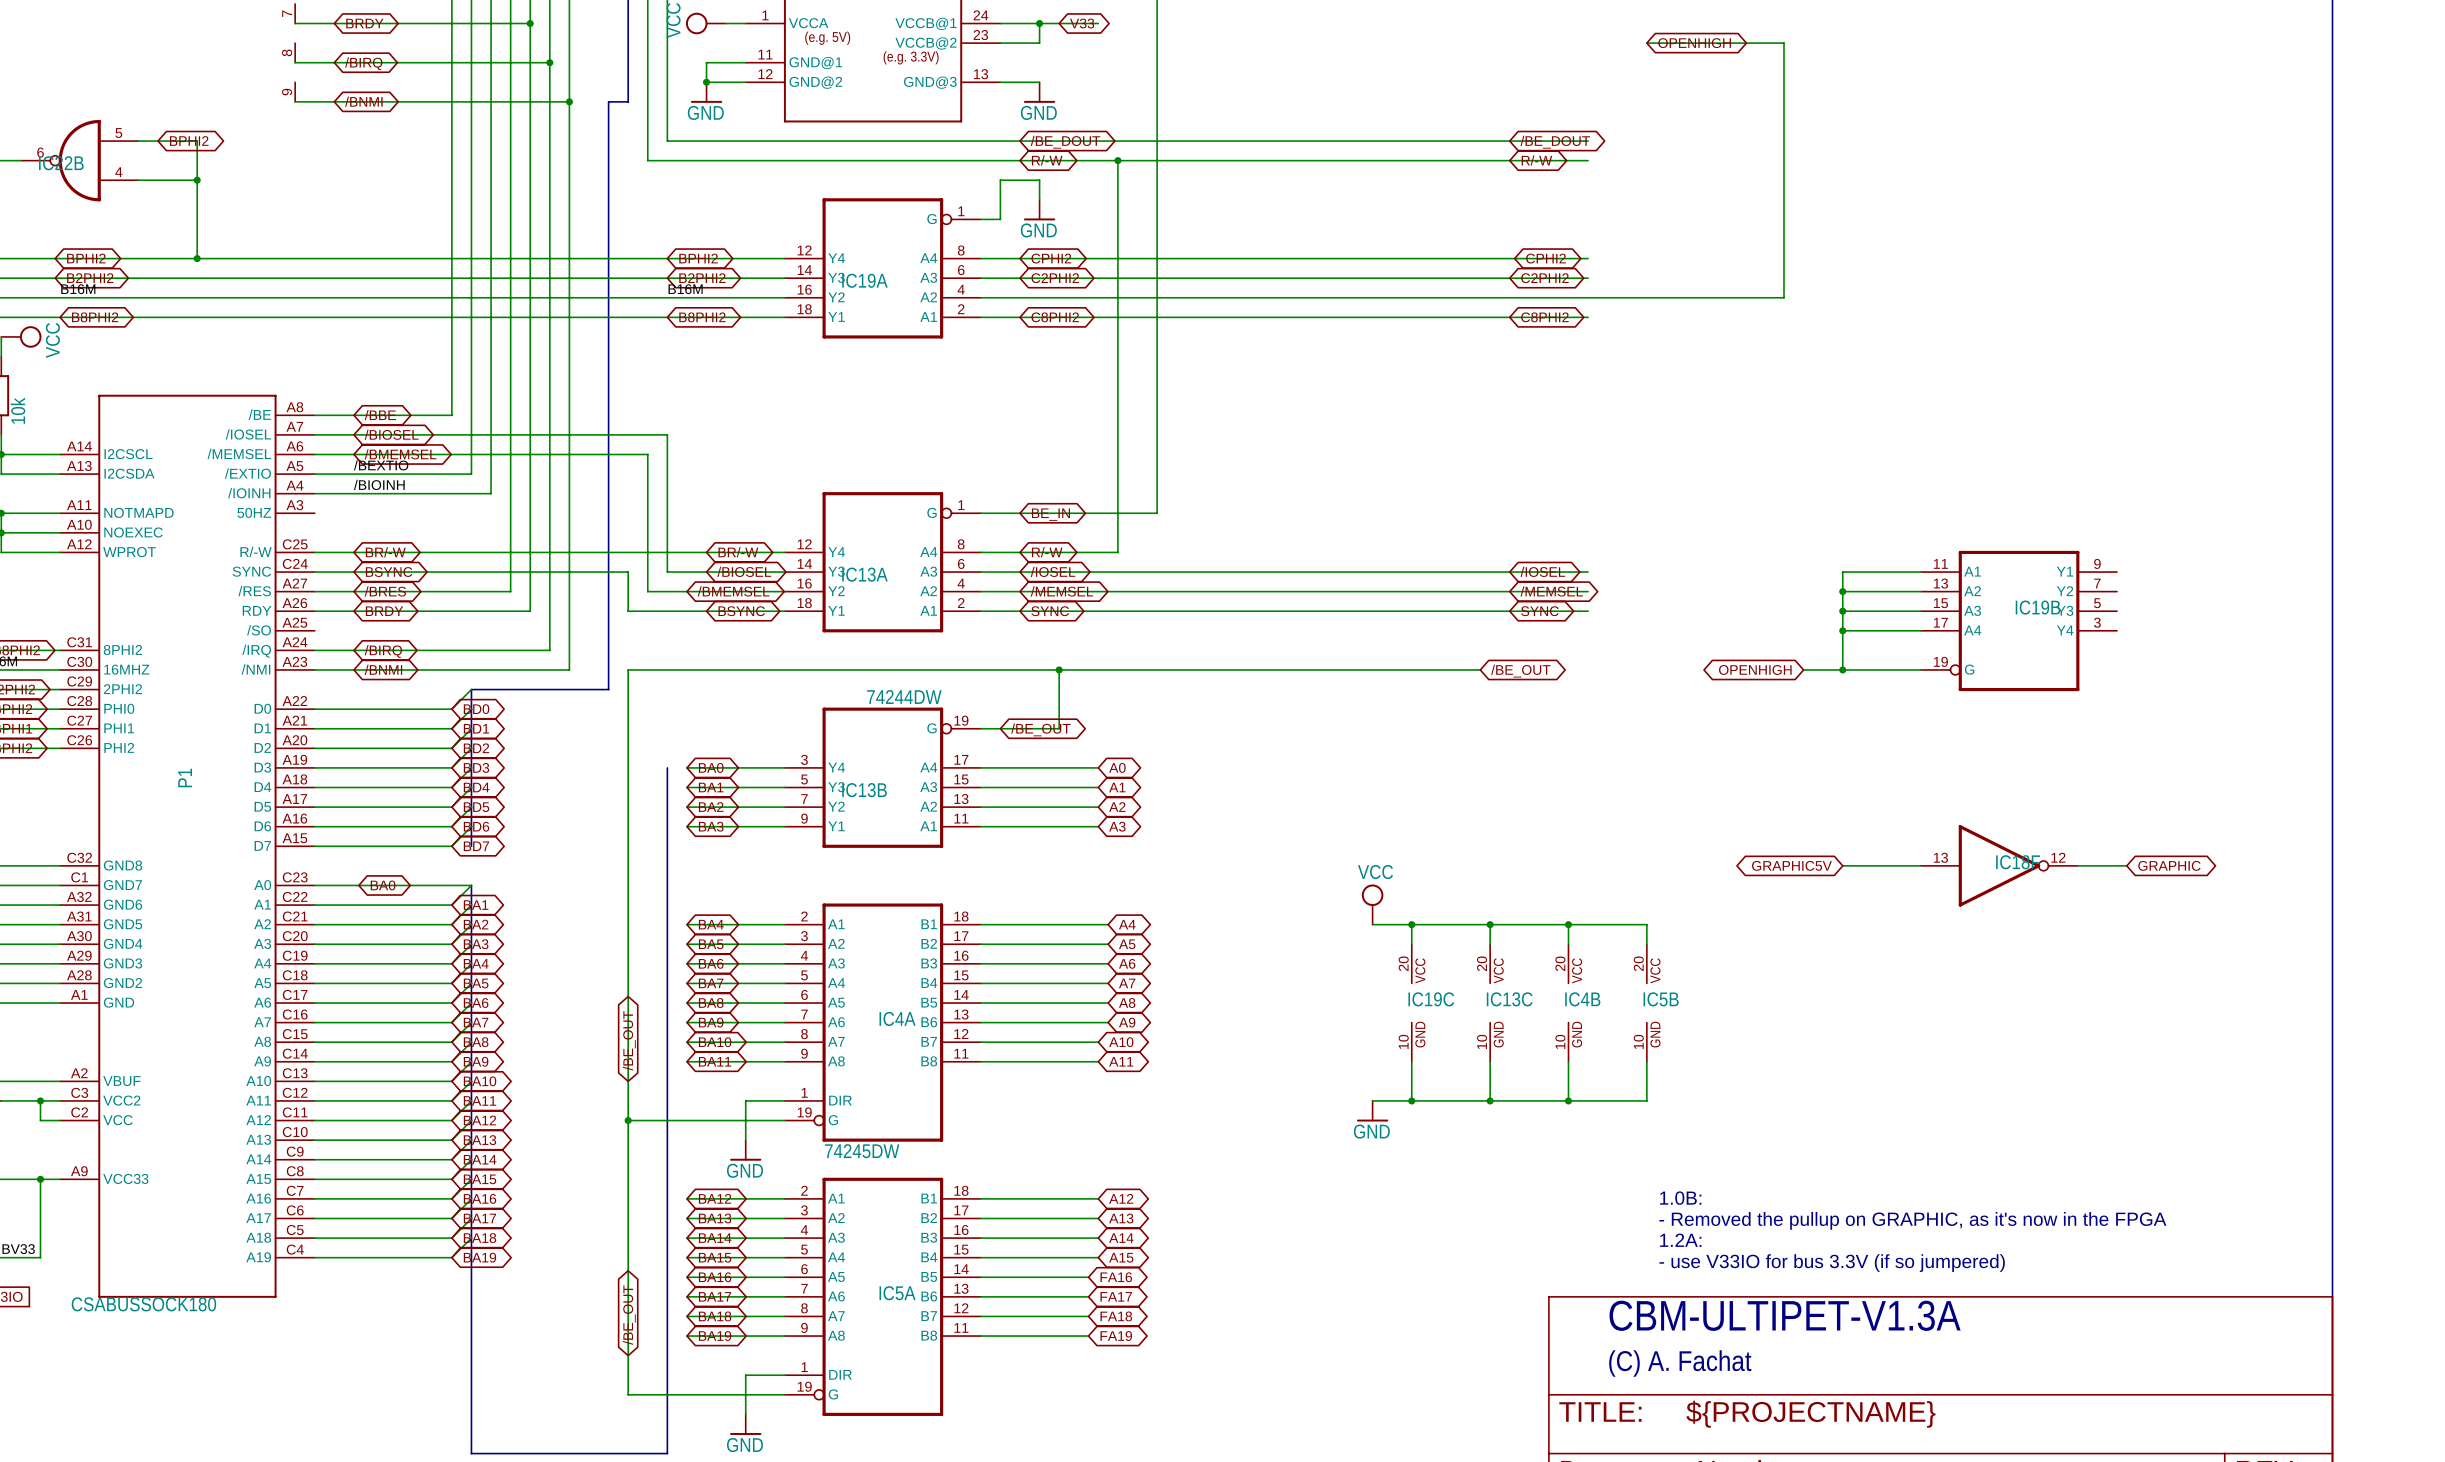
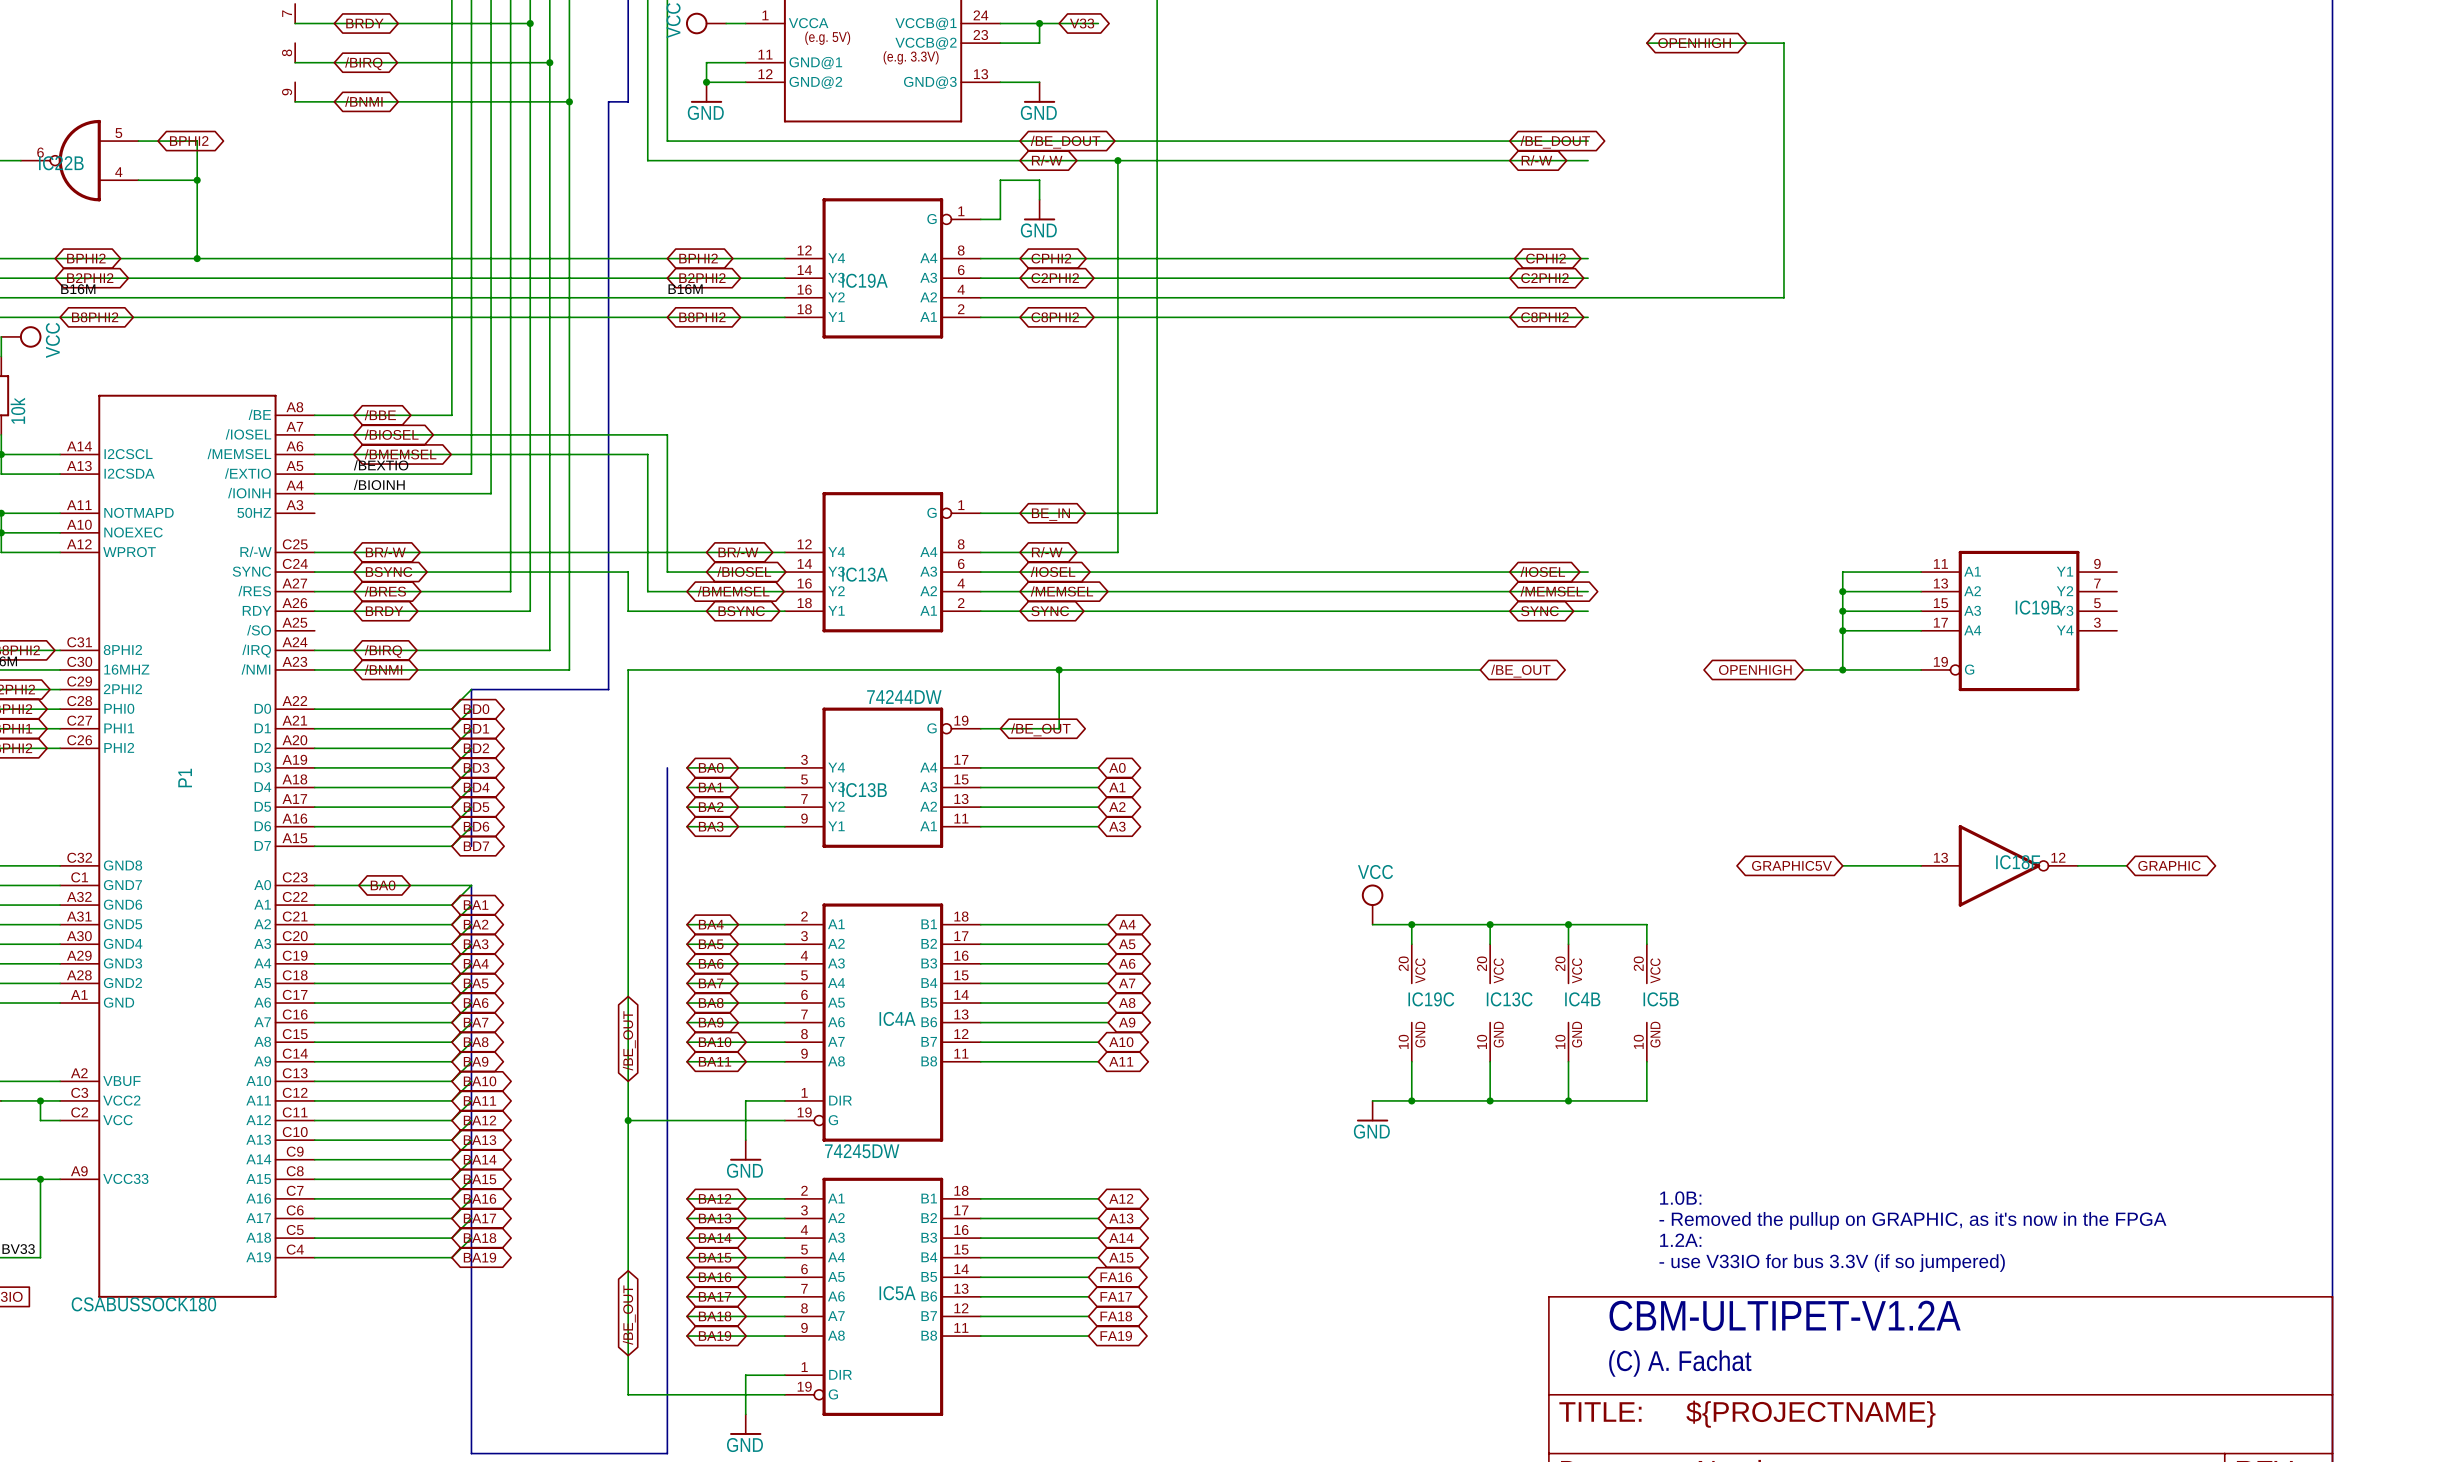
text: CBM-ULTIPET-V1.3A (1785, 1315) -> CBM-ULTIPET-V1.2A (1785, 1315)

